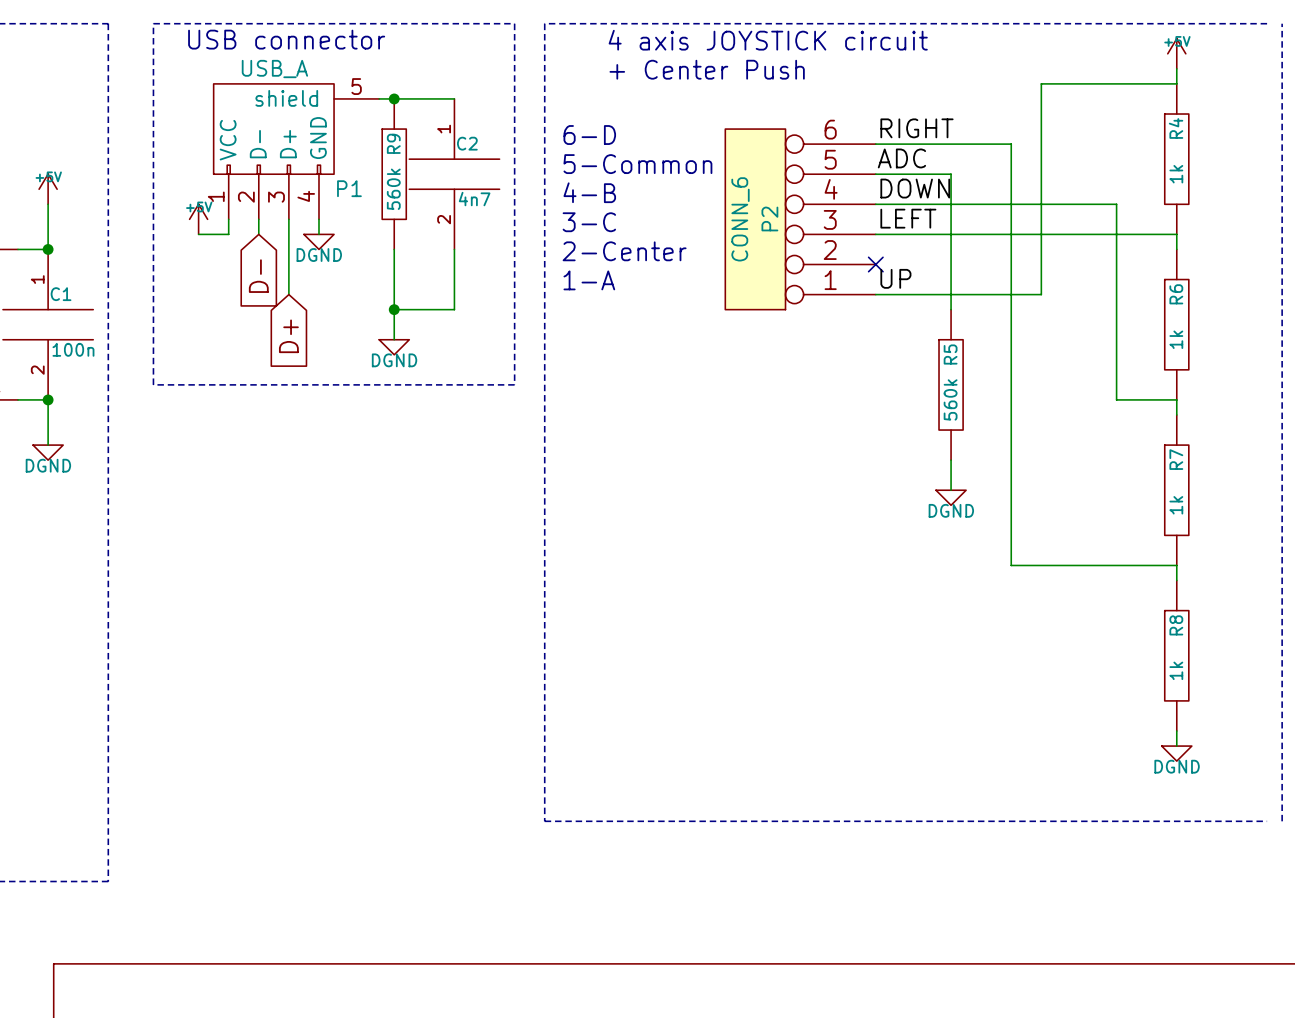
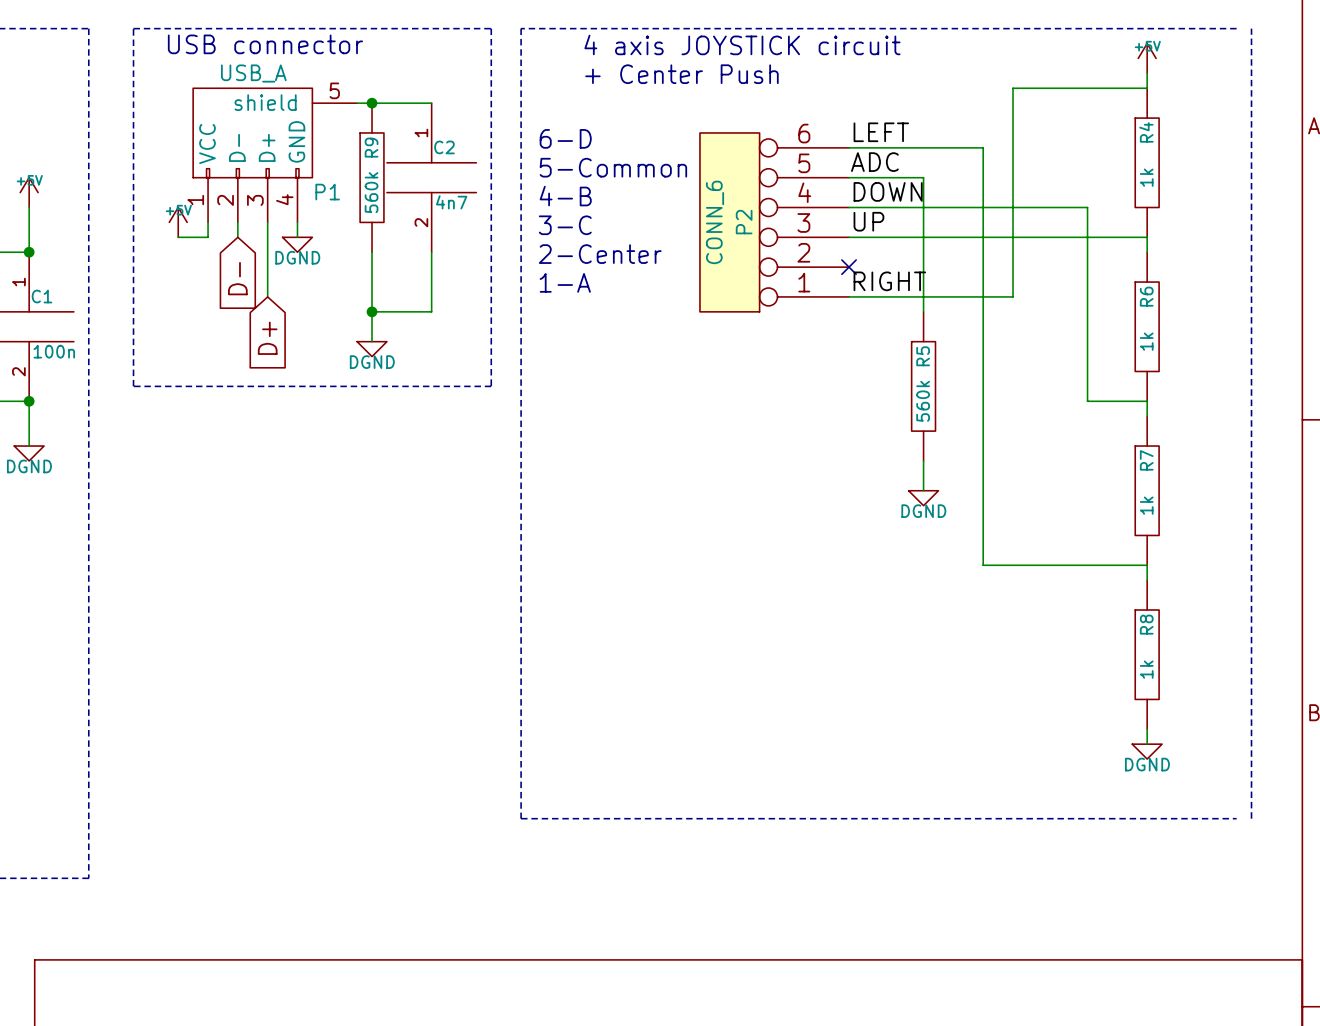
label: RIGHT (916, 128) -> LEFT (881, 132)
label: LEFT (908, 218) -> UP (868, 221)
label: UP (895, 278) -> RIGHT (889, 281)

